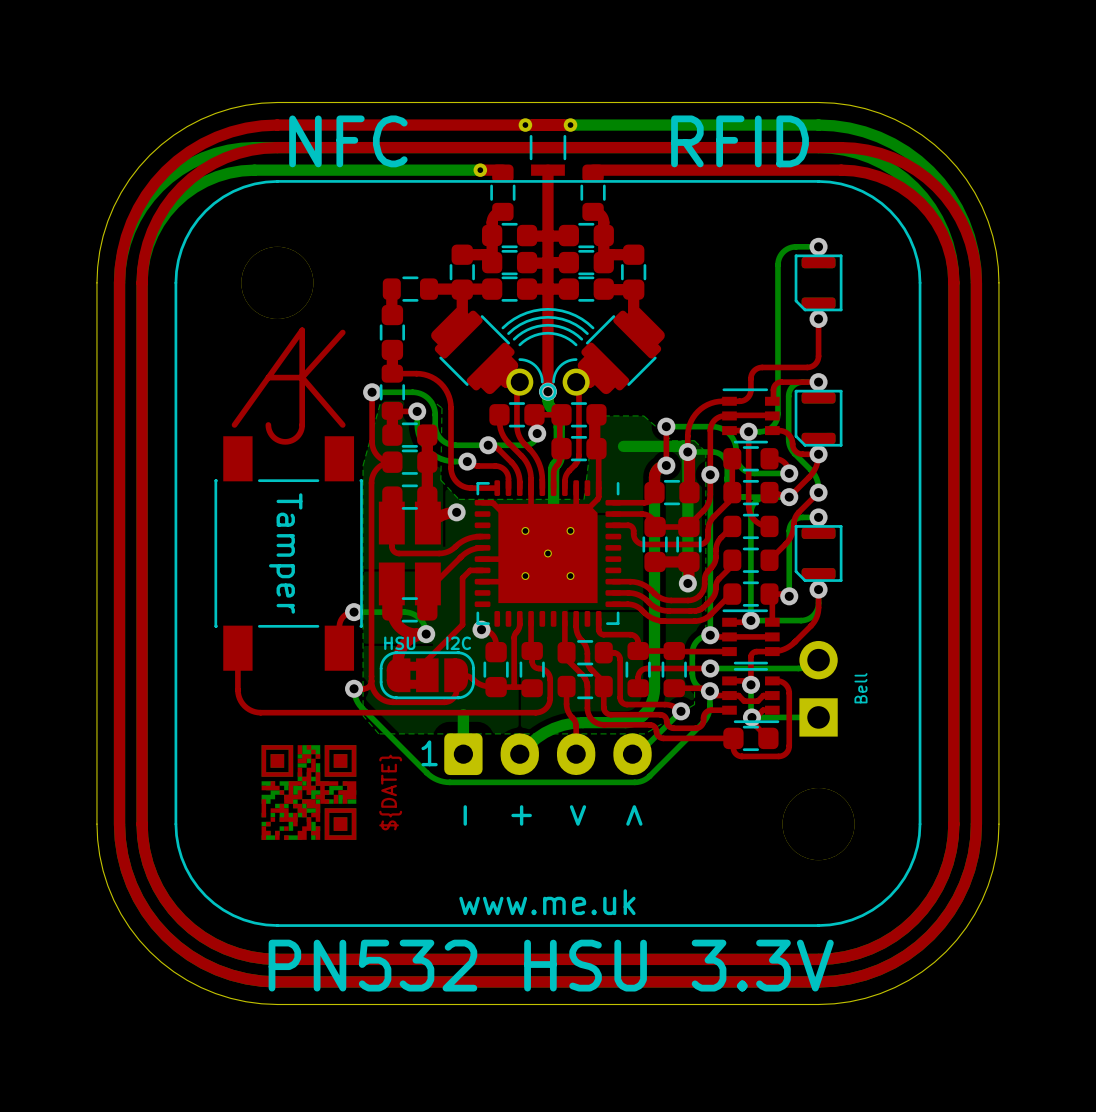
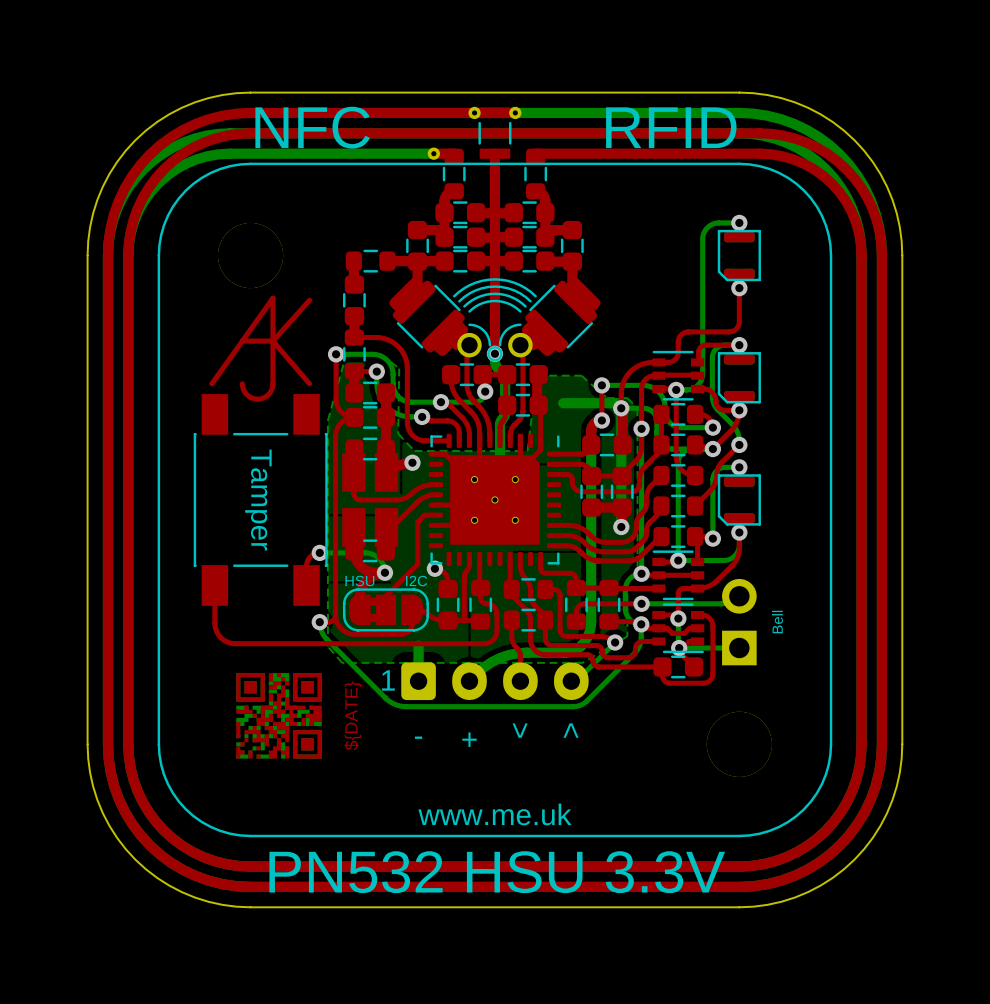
text rotation: 0° (465, 815) -> 90° counterclockwise (418, 737)
text rotation: 0° (521, 815) -> 90° counterclockwise (469, 739)

